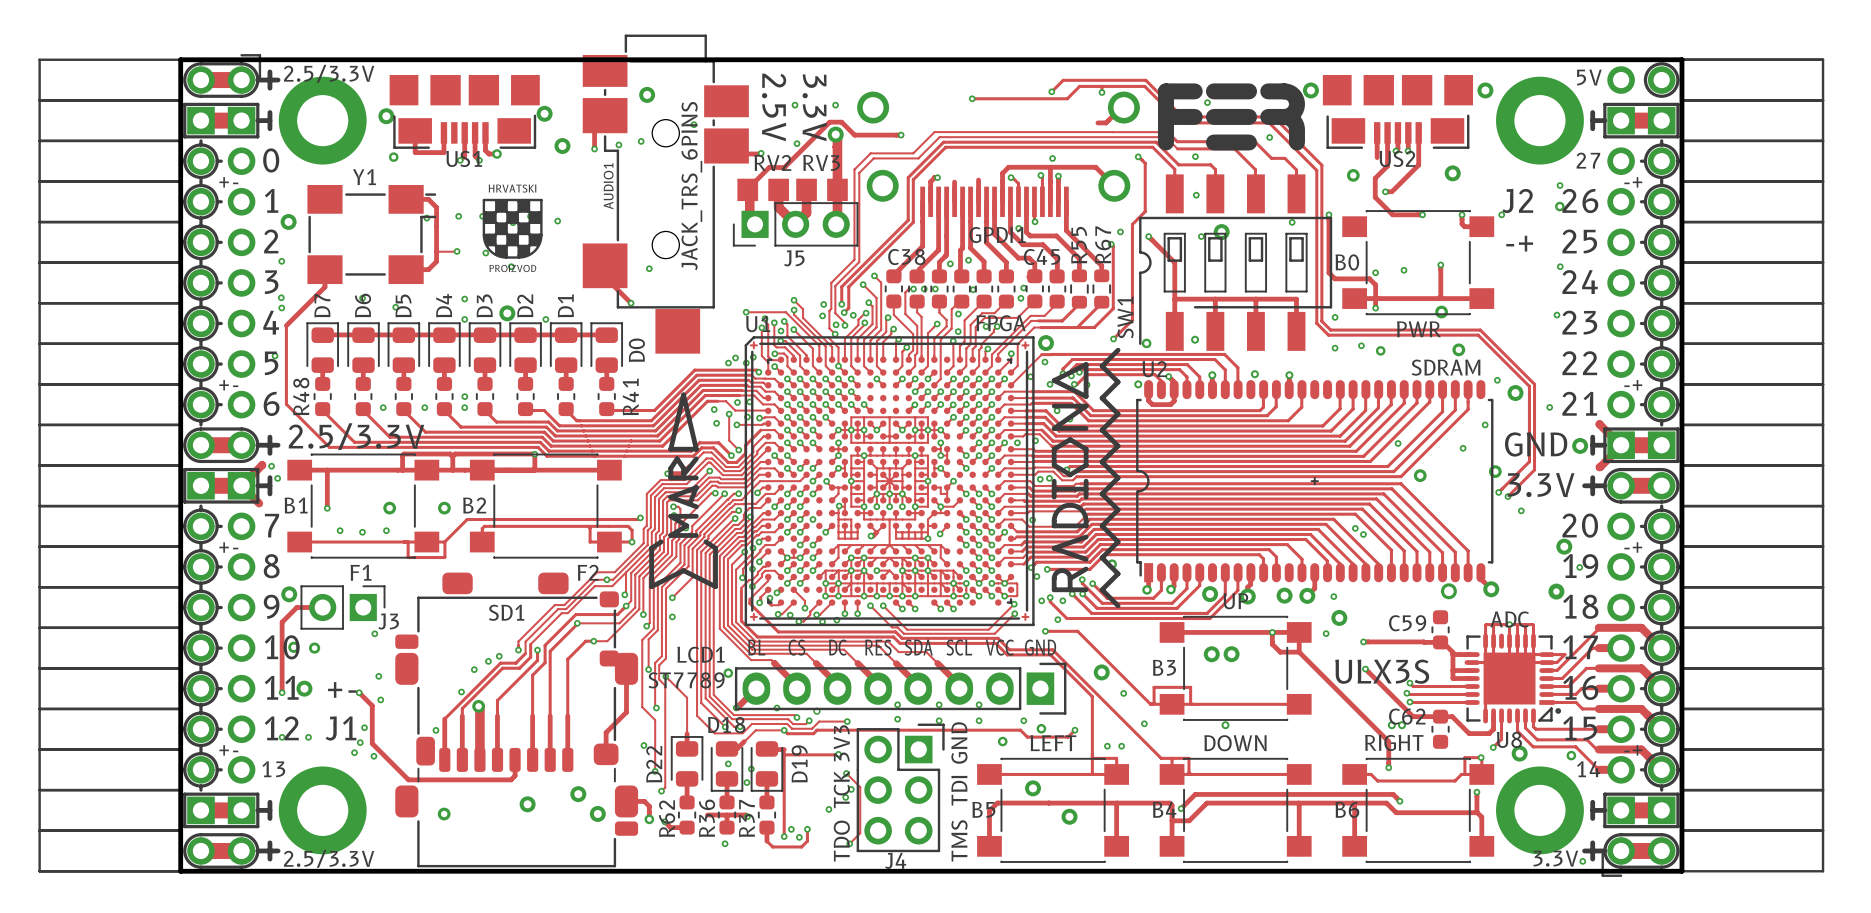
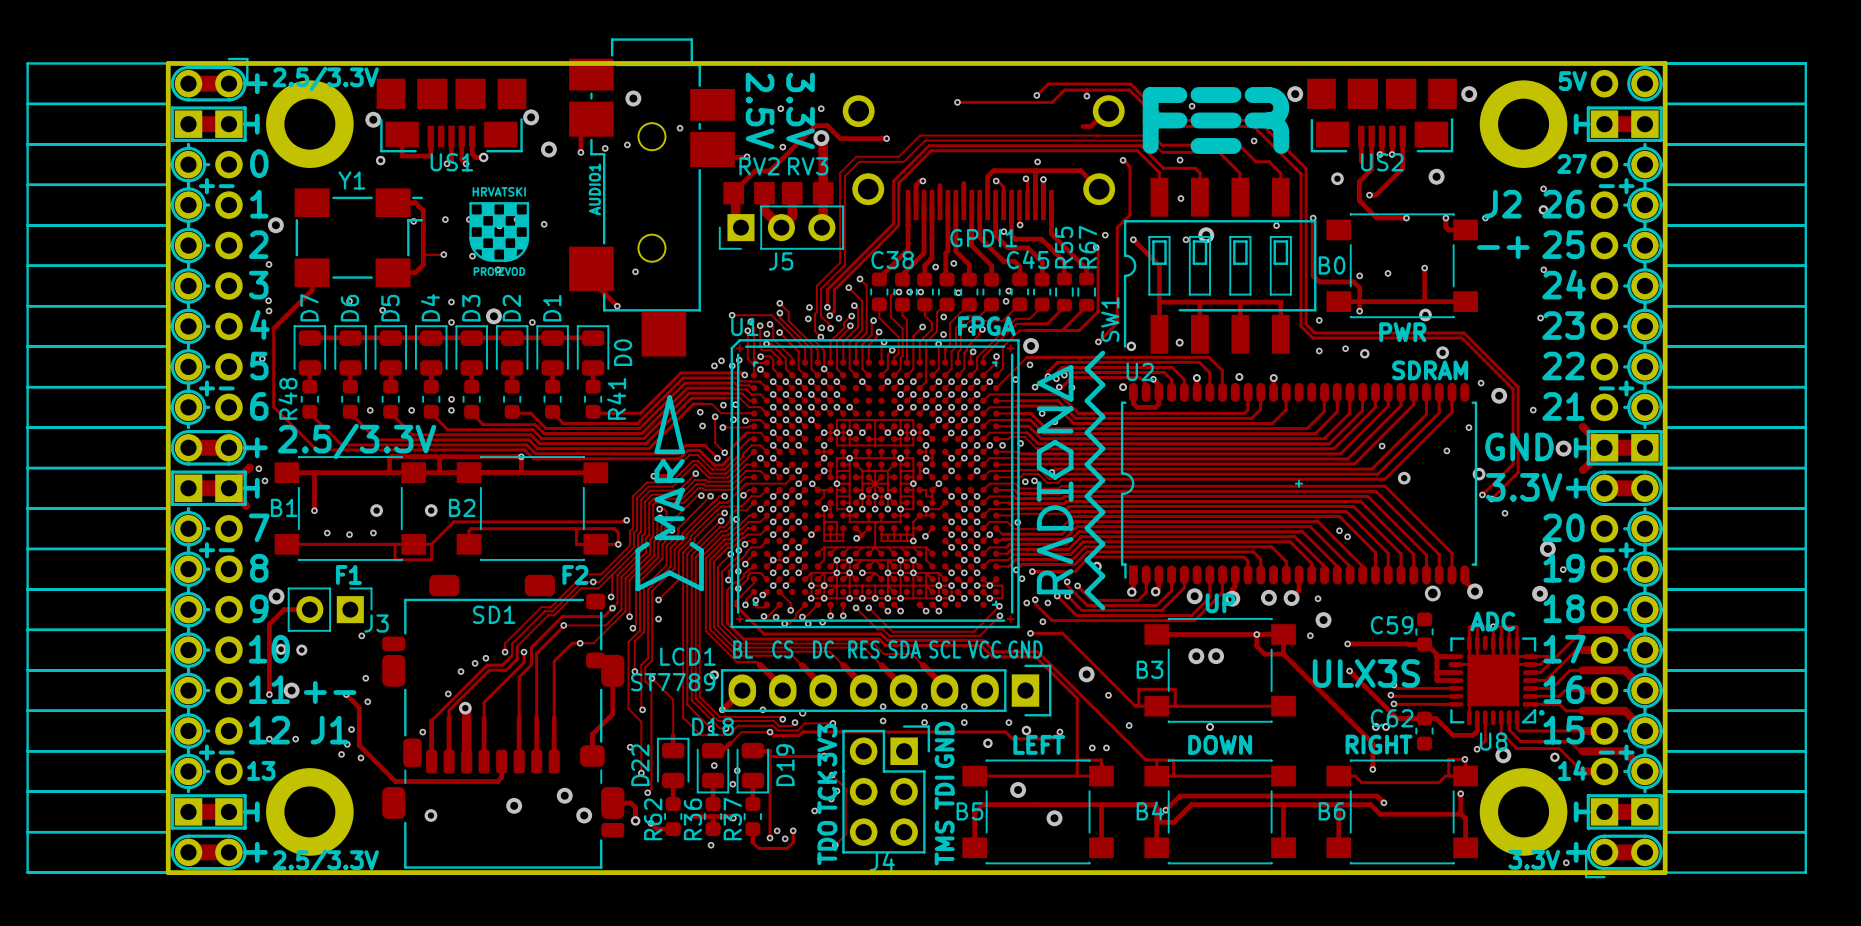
AUDIO1 value: JACK_TRS_6PINS (691, 186) -> none

